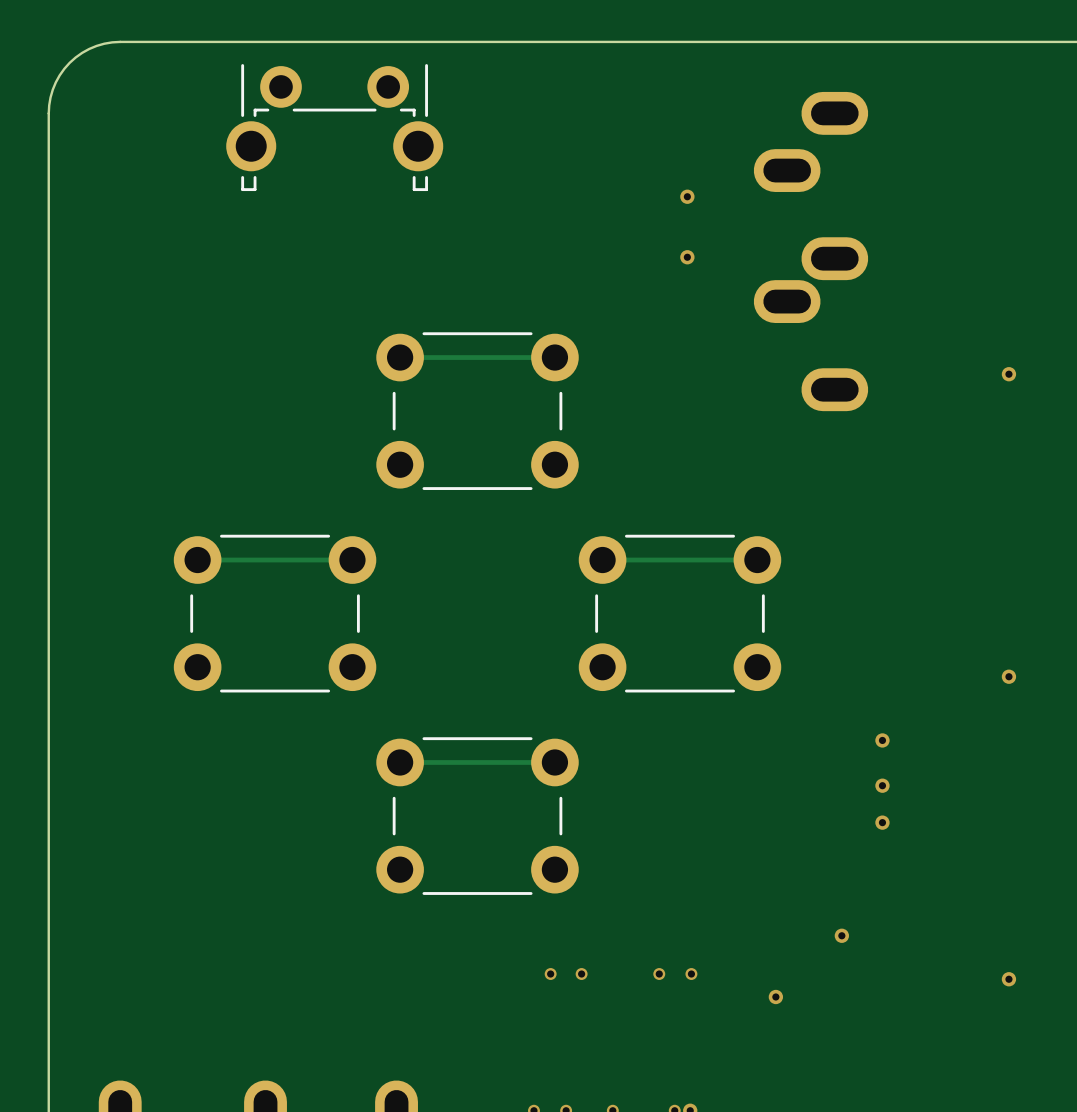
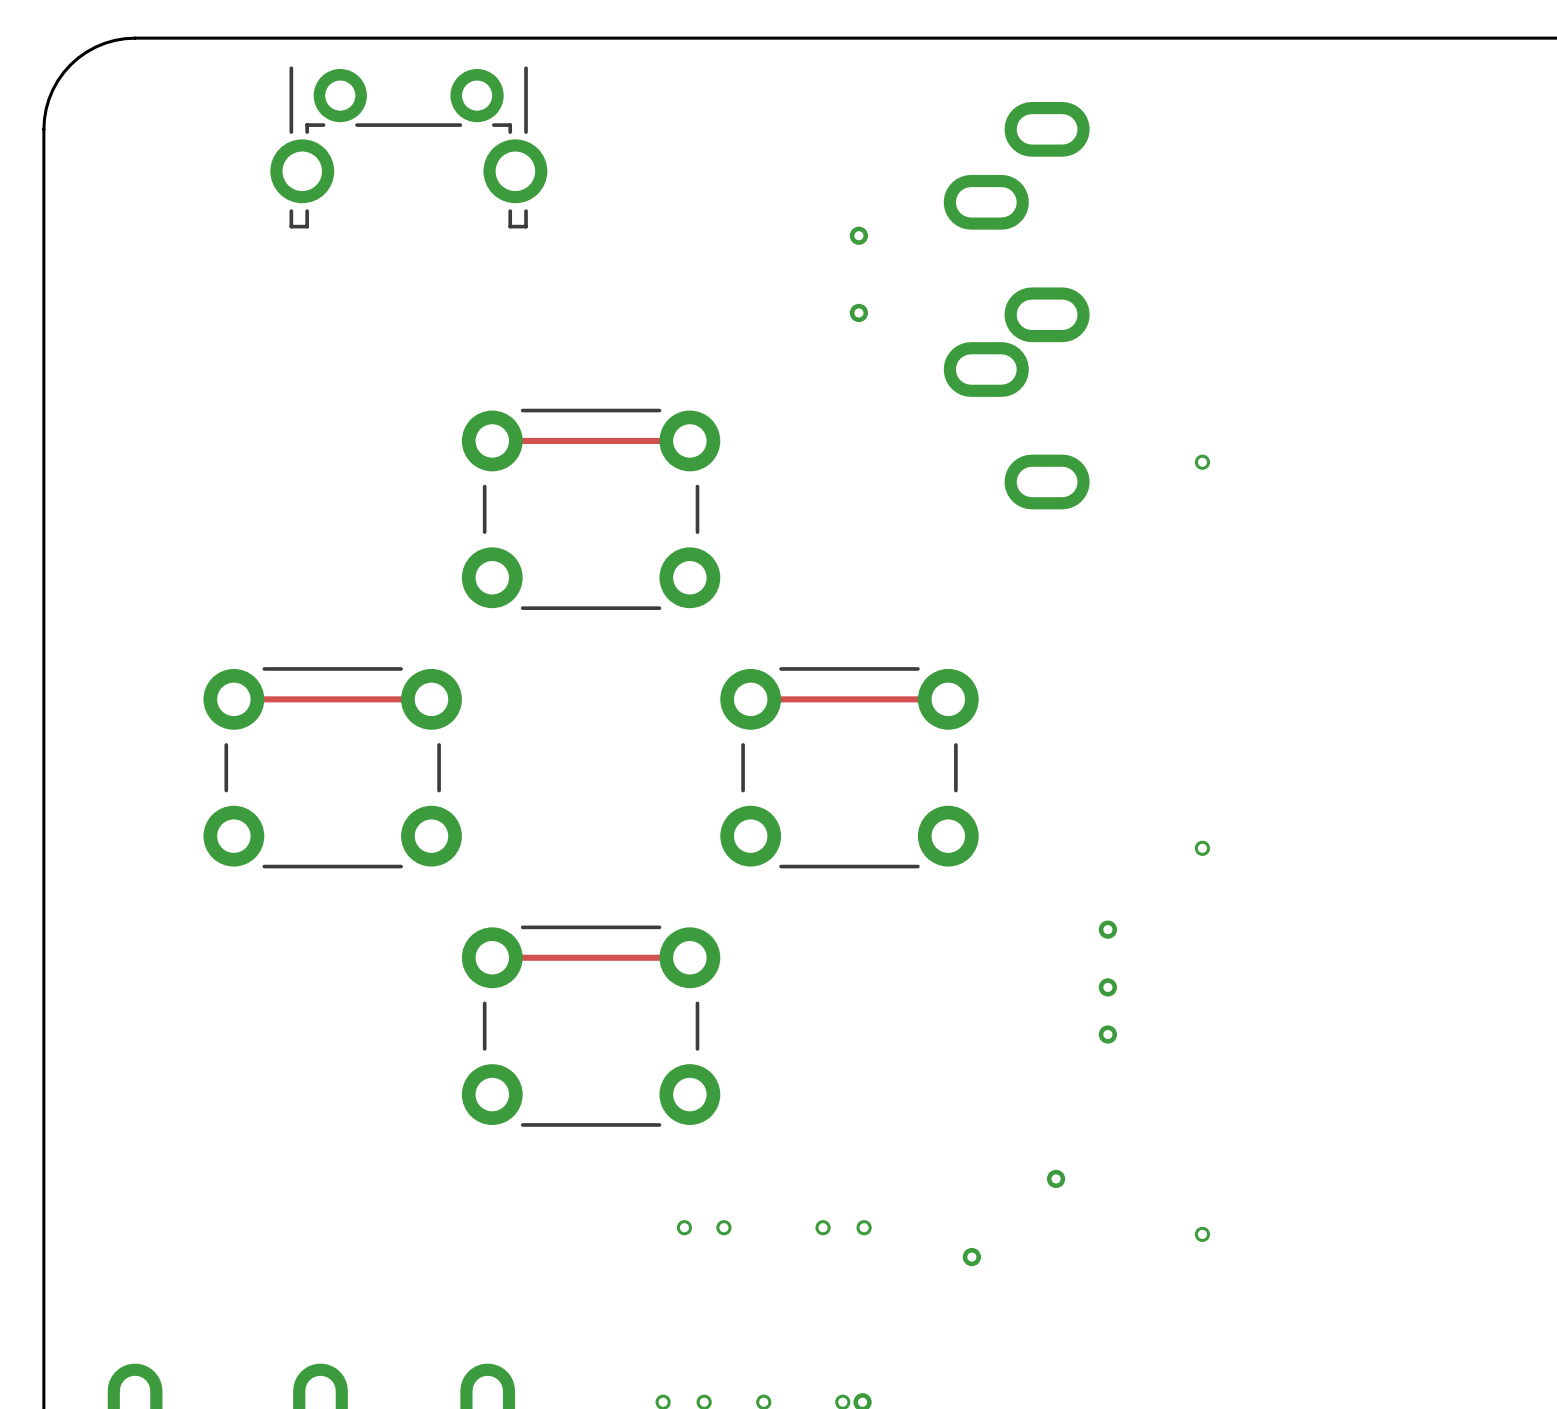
via: none -> (1202, 462)
via: (1008, 374) -> none
via: none -> (1202, 848)
via: (1008, 676) -> none
via: none -> (1202, 1234)
via: (1008, 979) -> none

